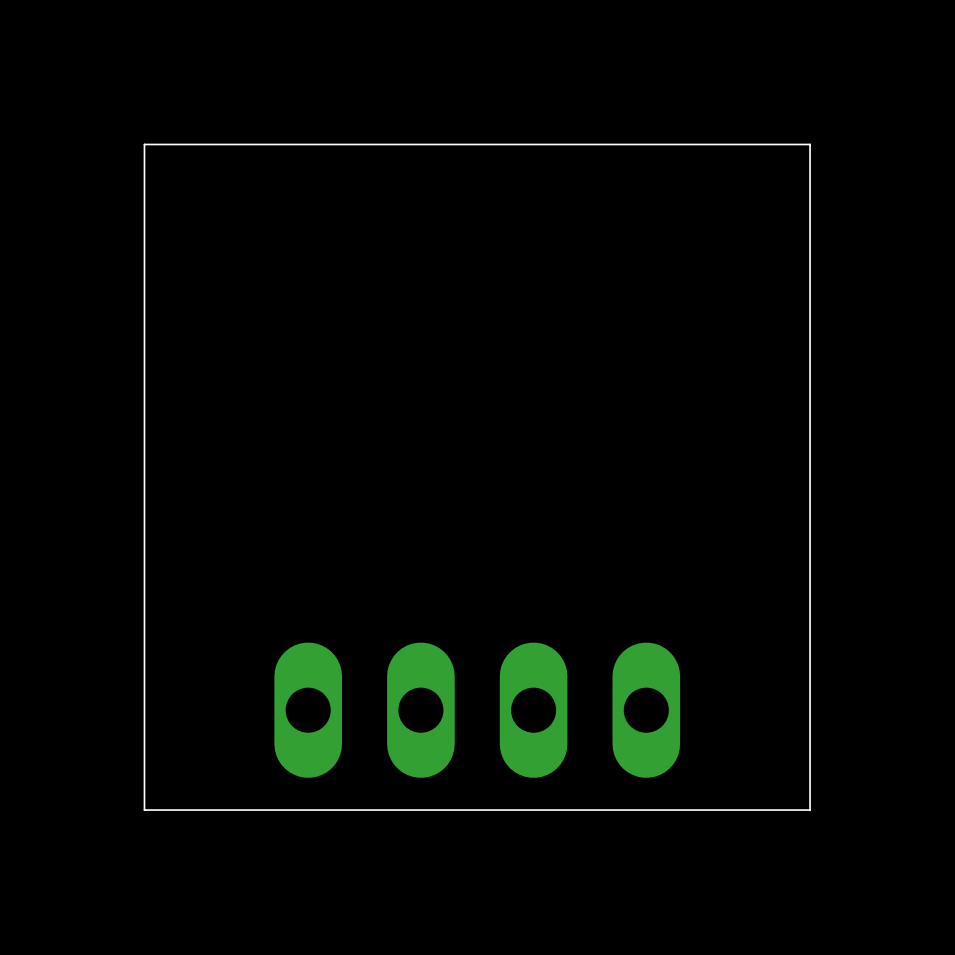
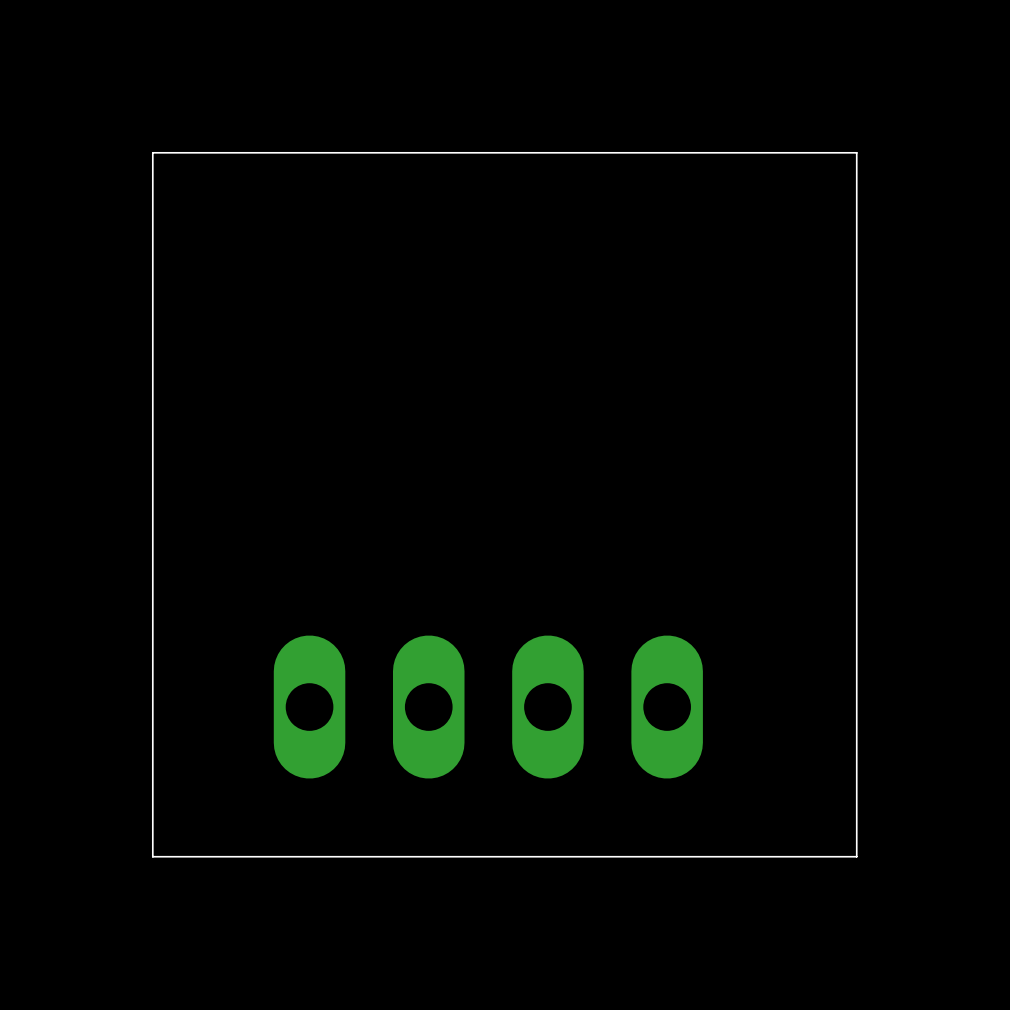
part position: (477, 710) -> (488, 707)

